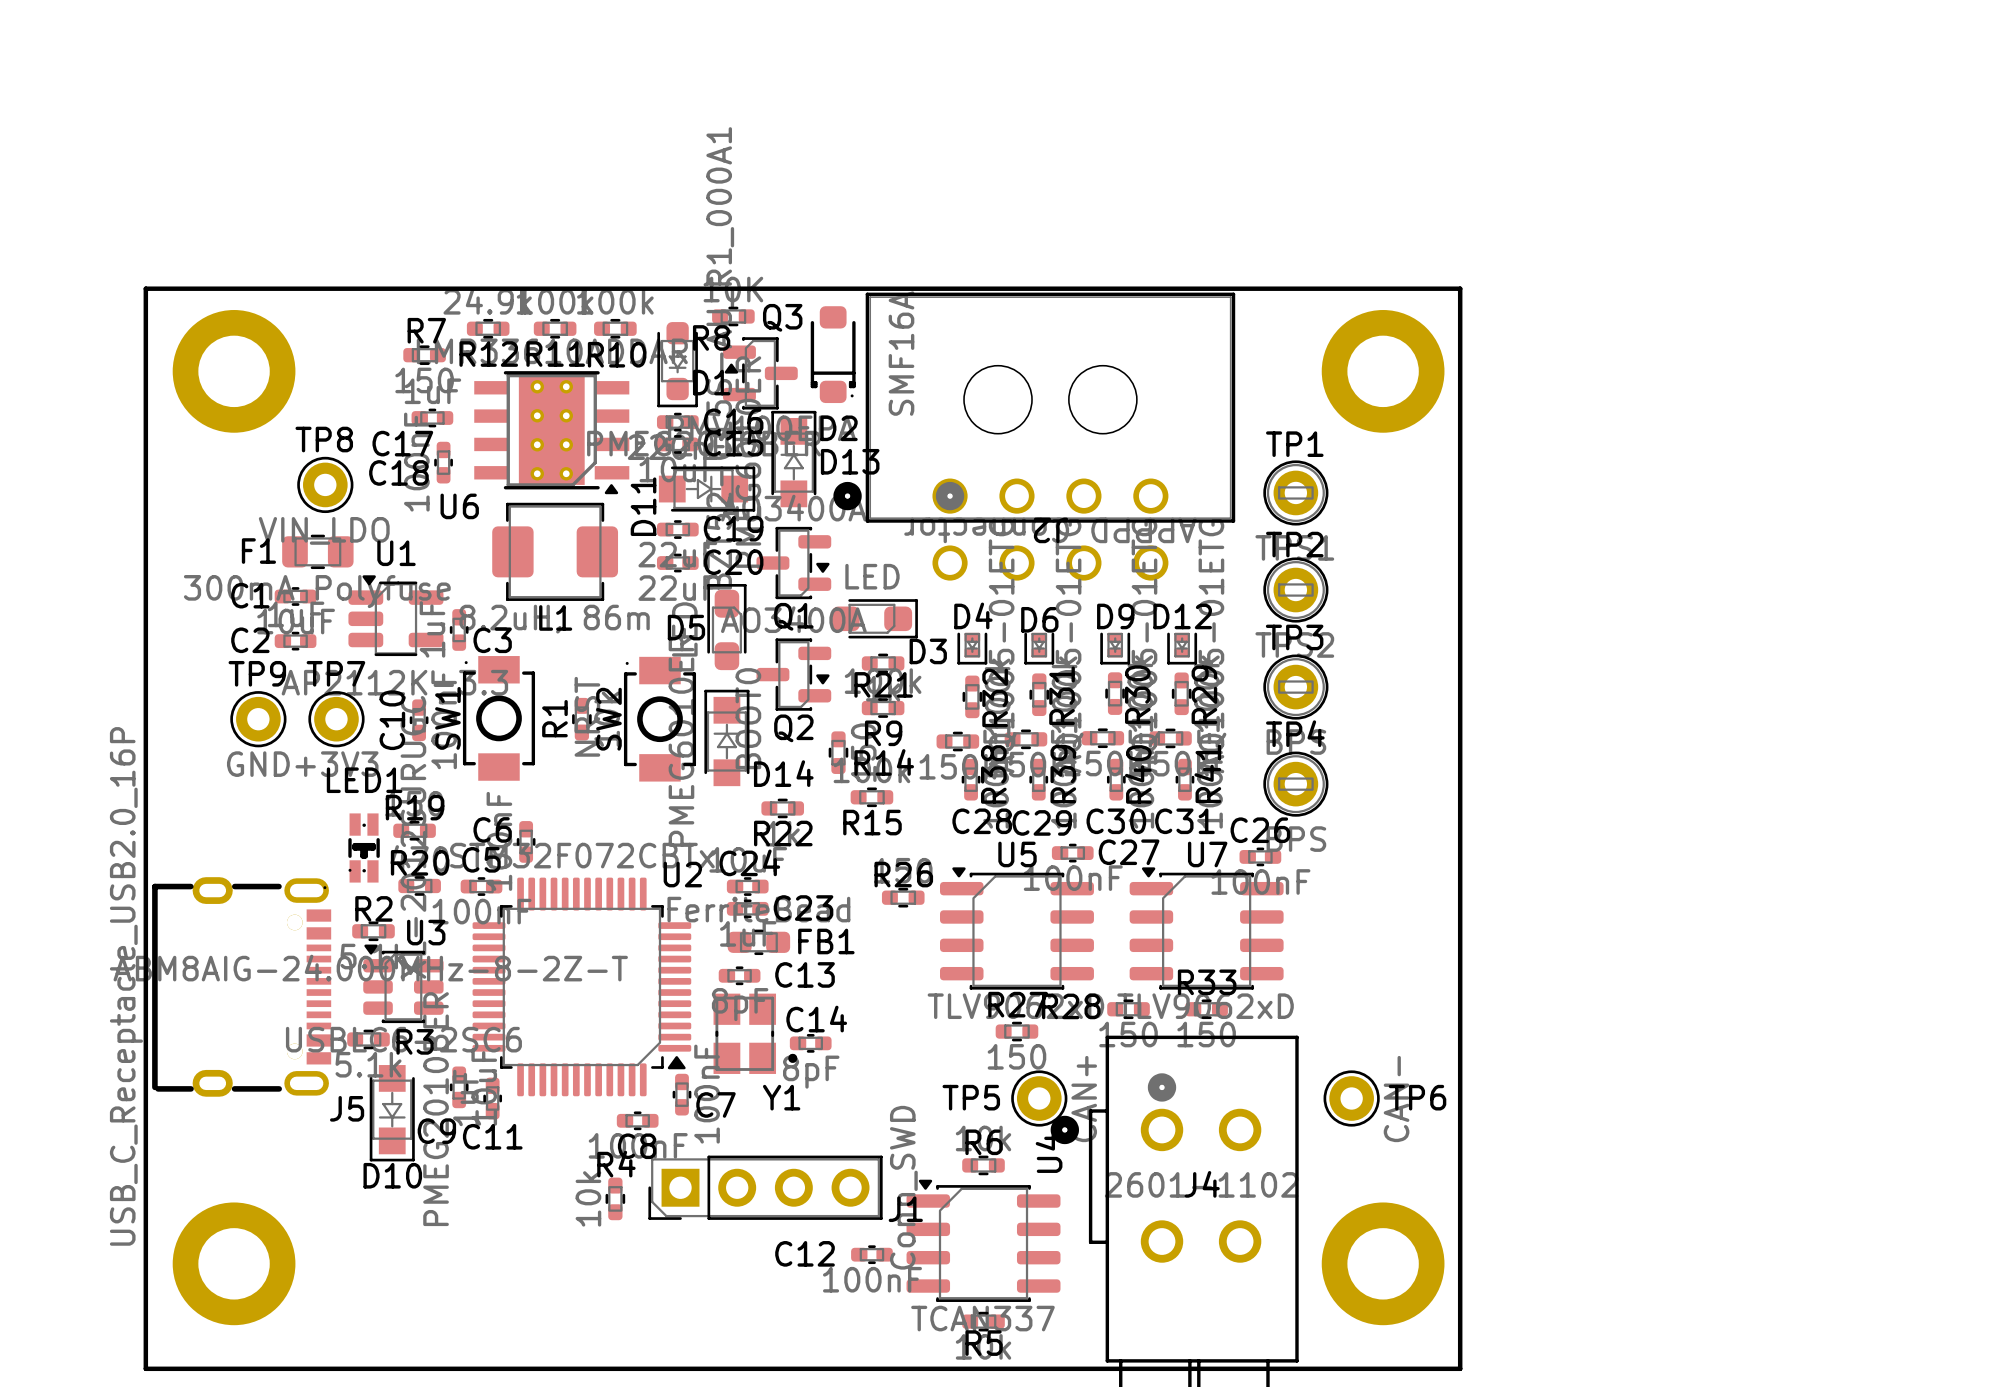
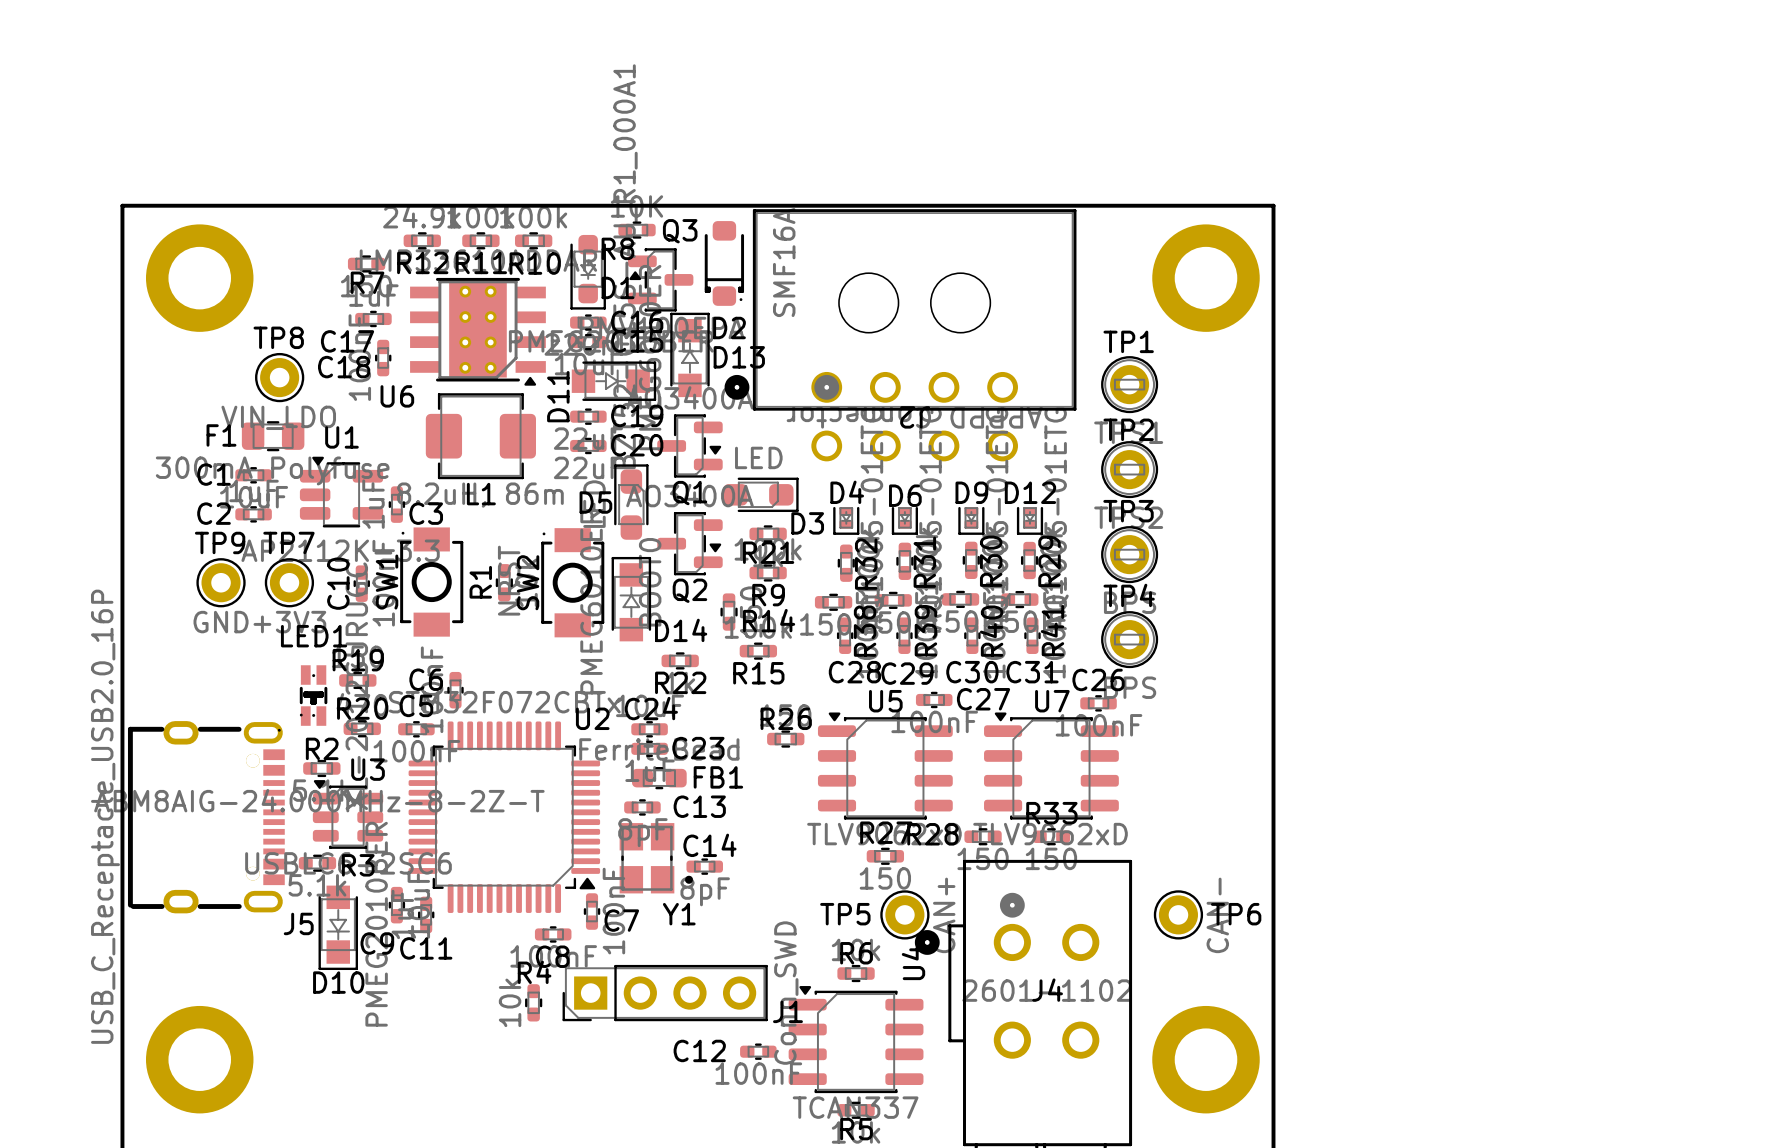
R7 name position: R7 (426, 330) -> R7 (367, 282)

